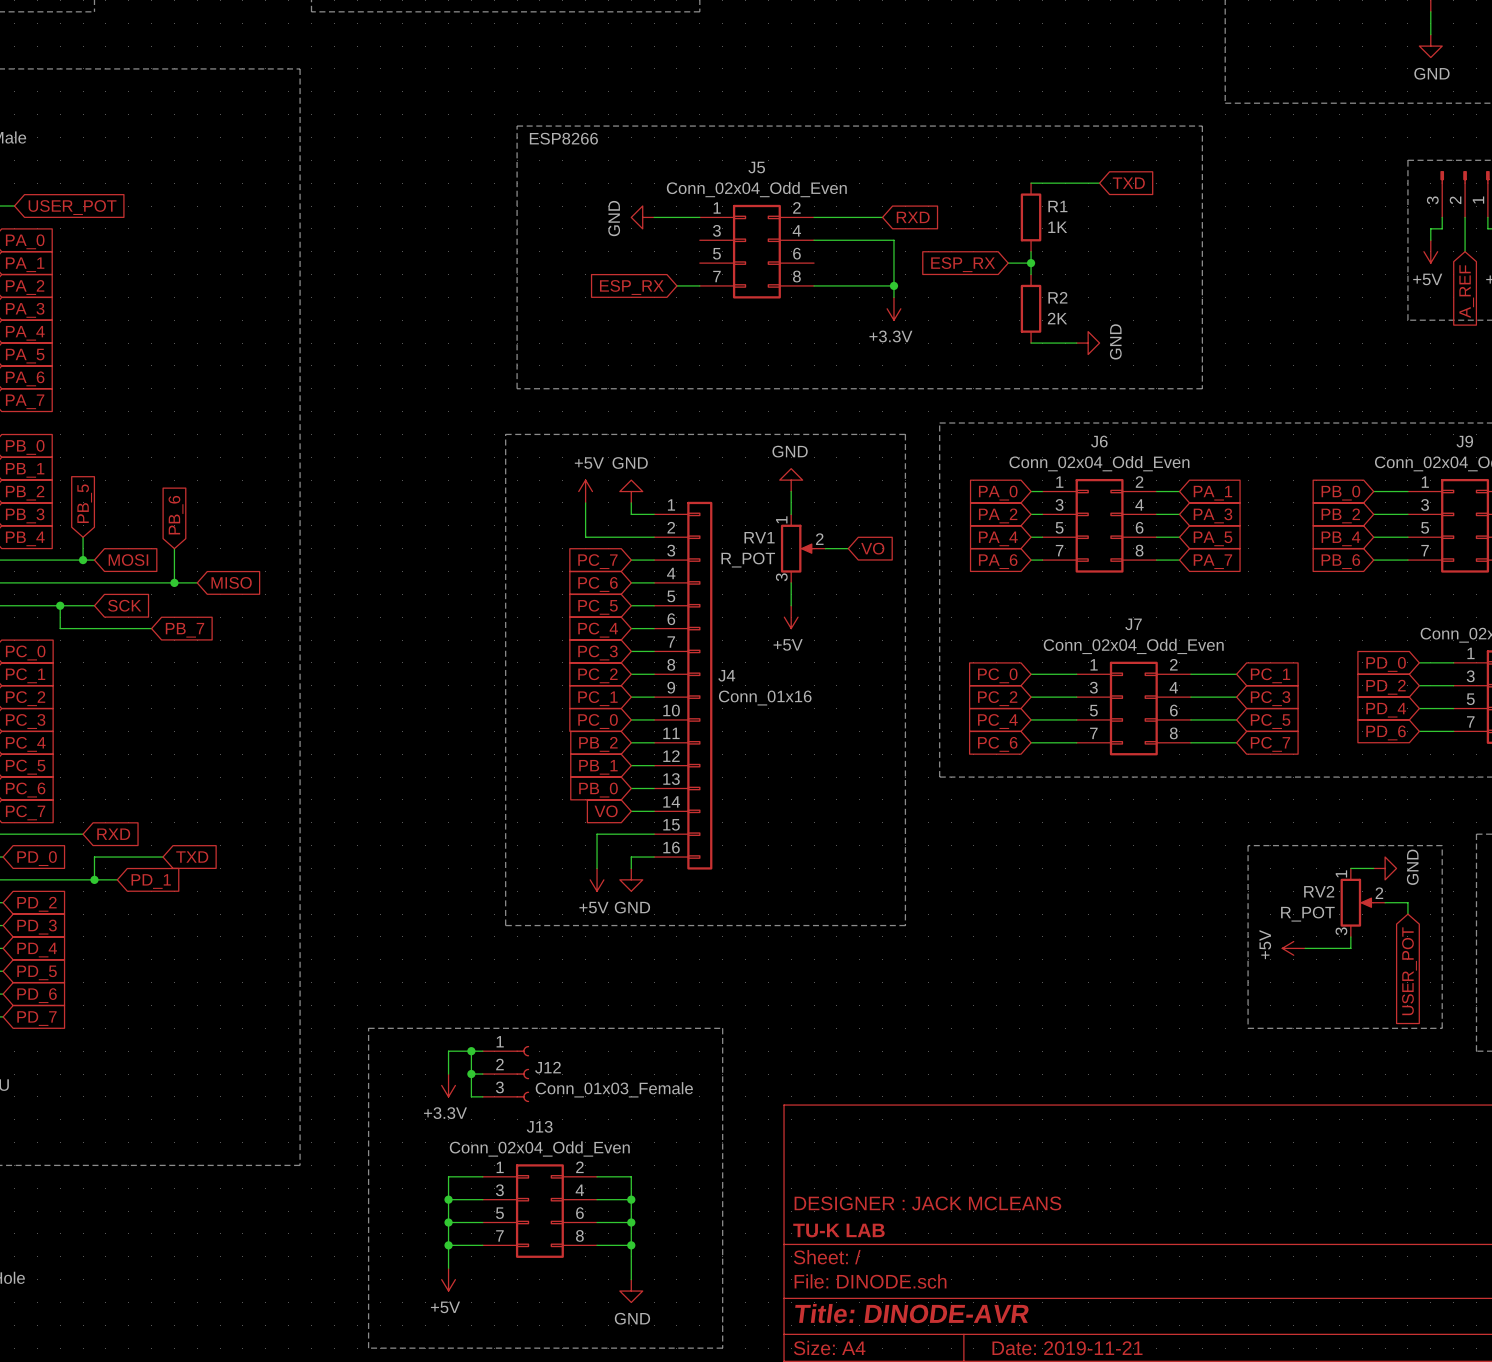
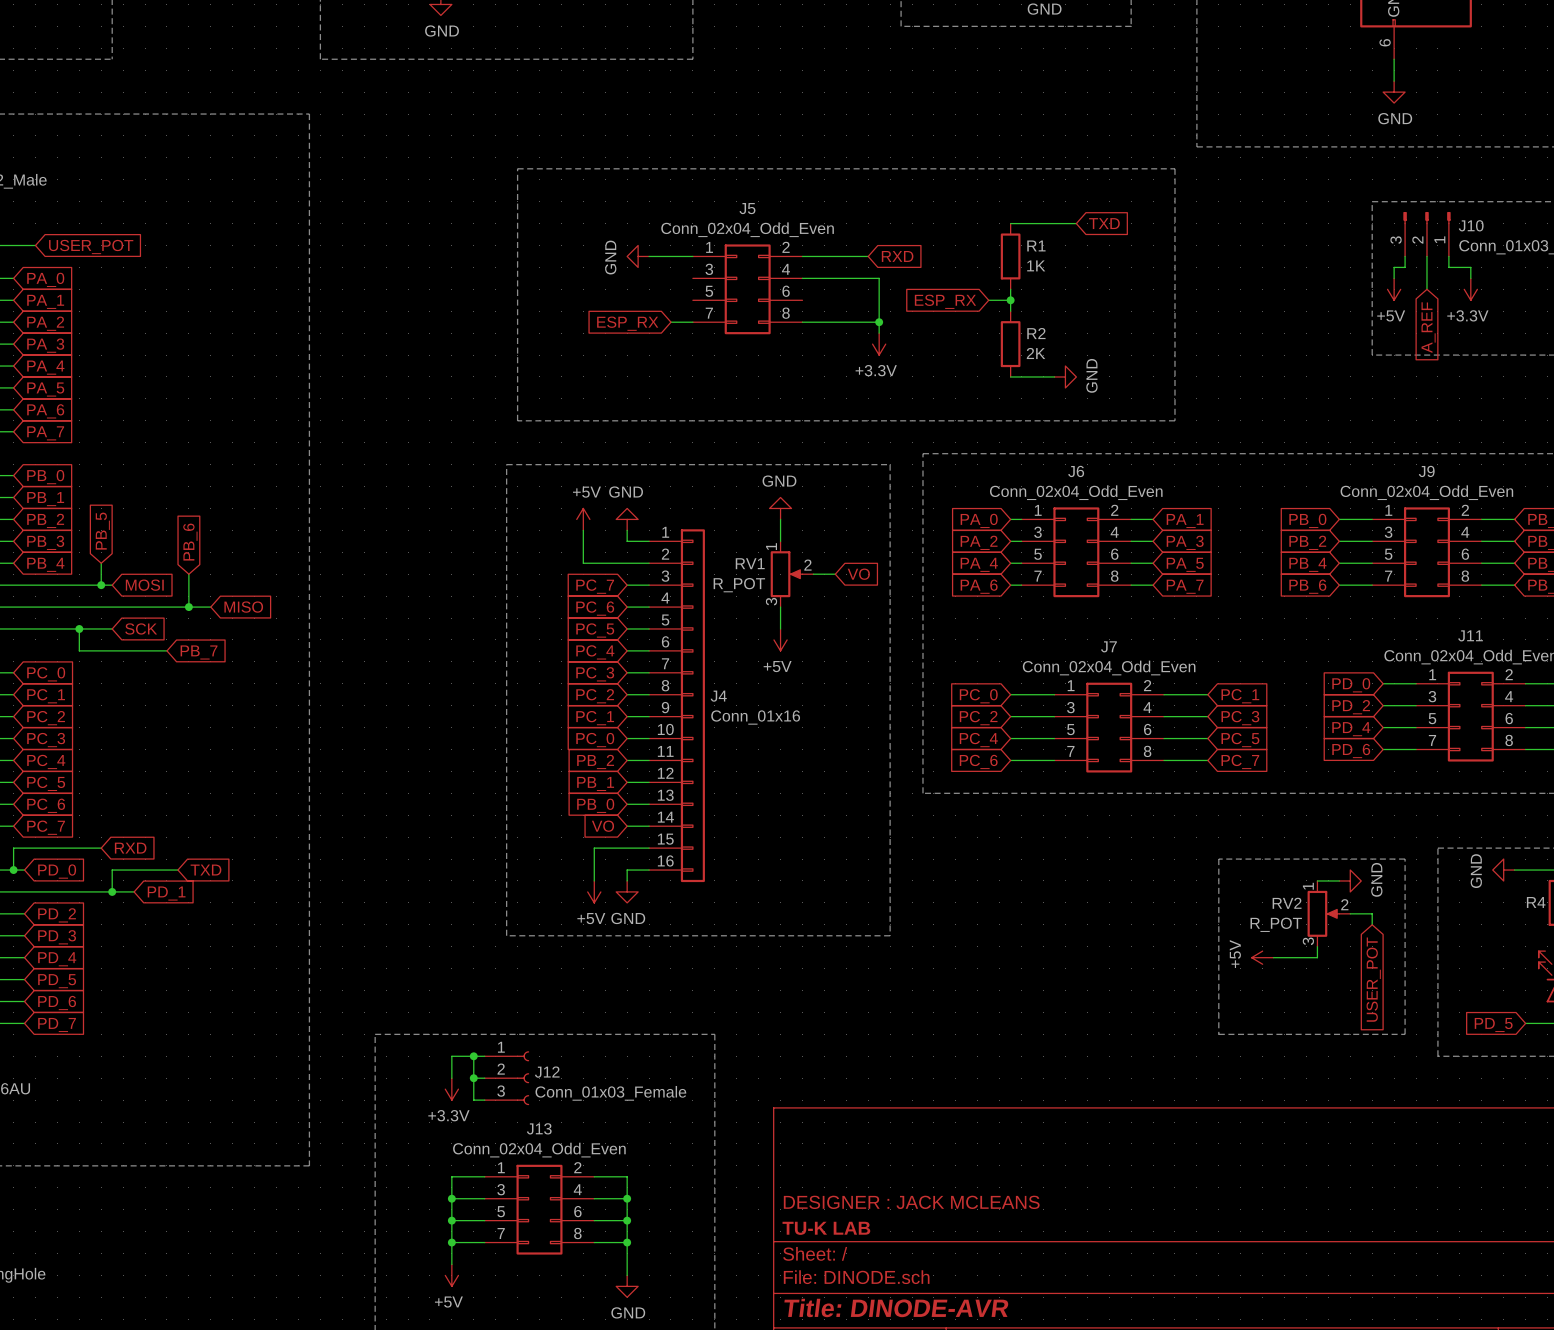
label: ESP8266 (563, 138) -> none

